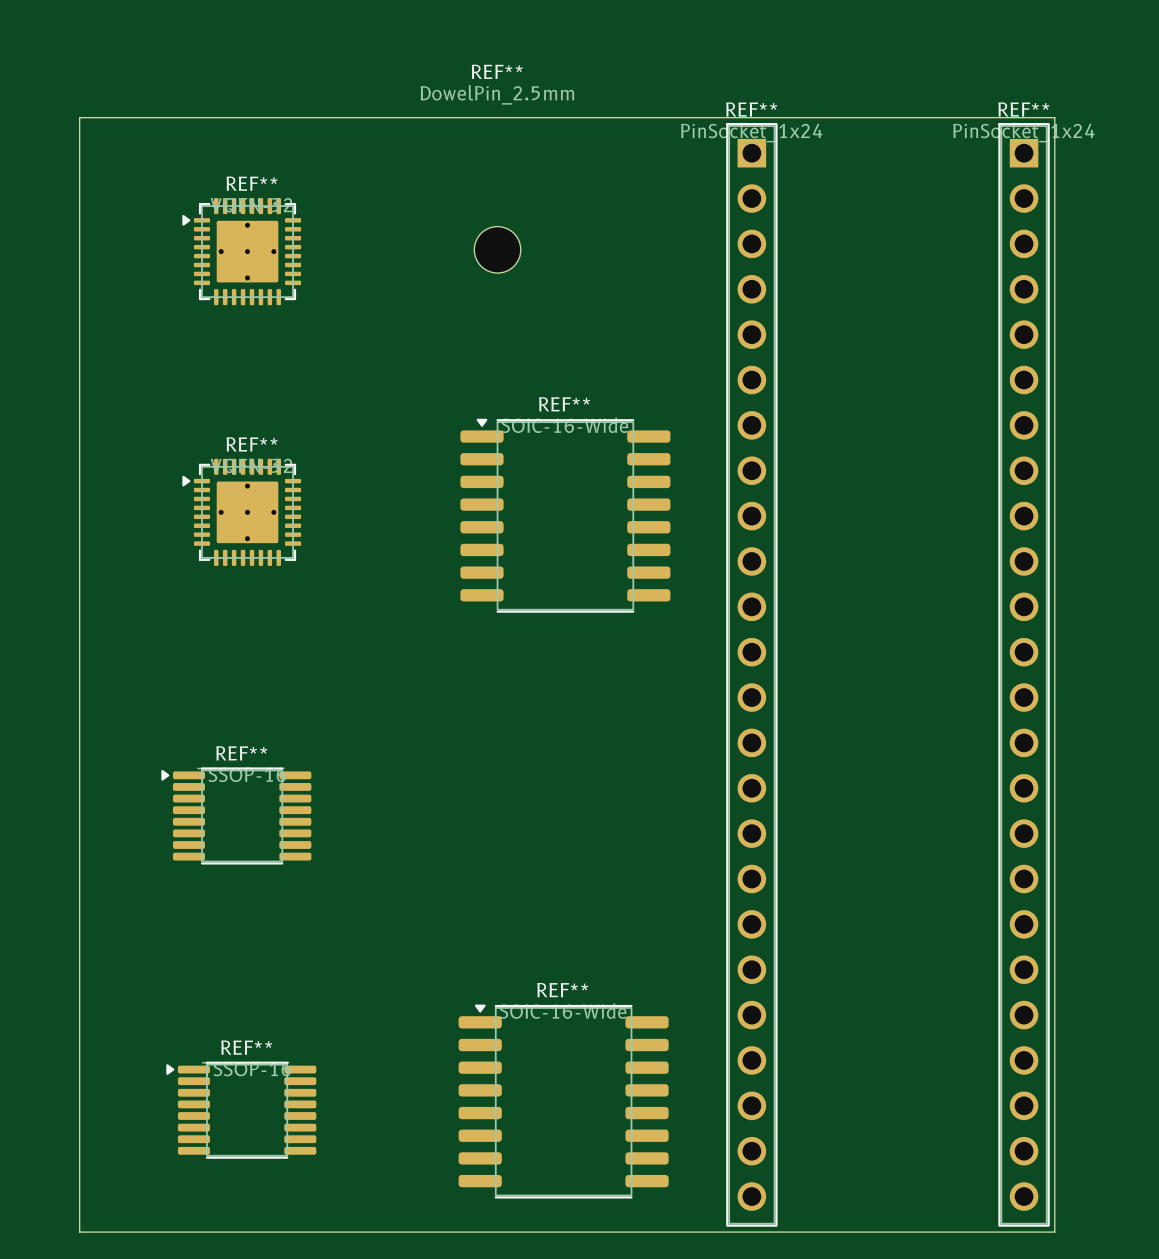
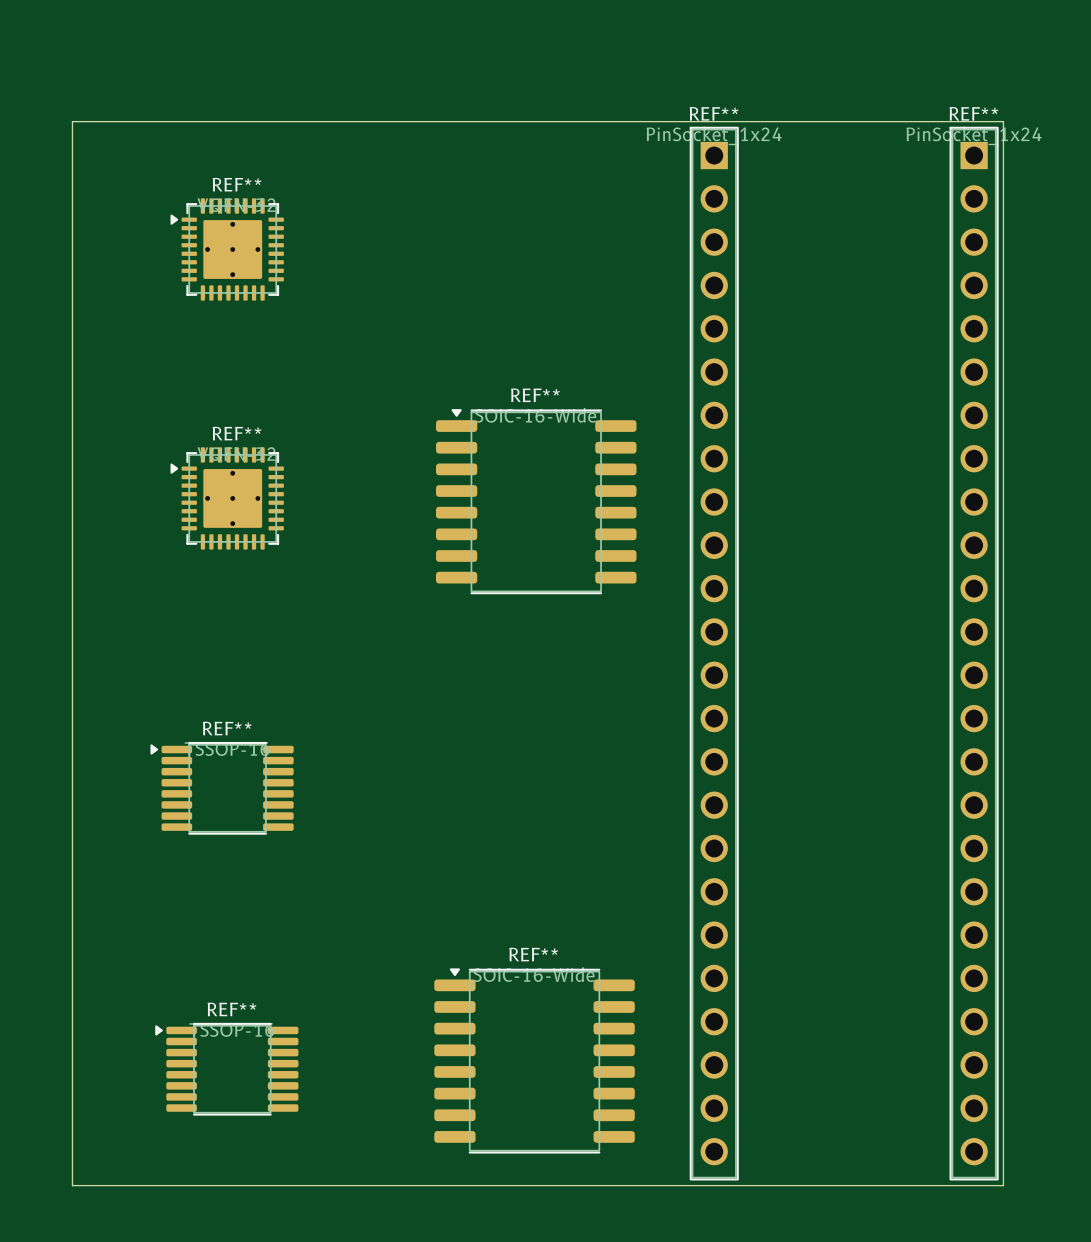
REF**: DowelPin_2.5mm (497, 249) -> none

